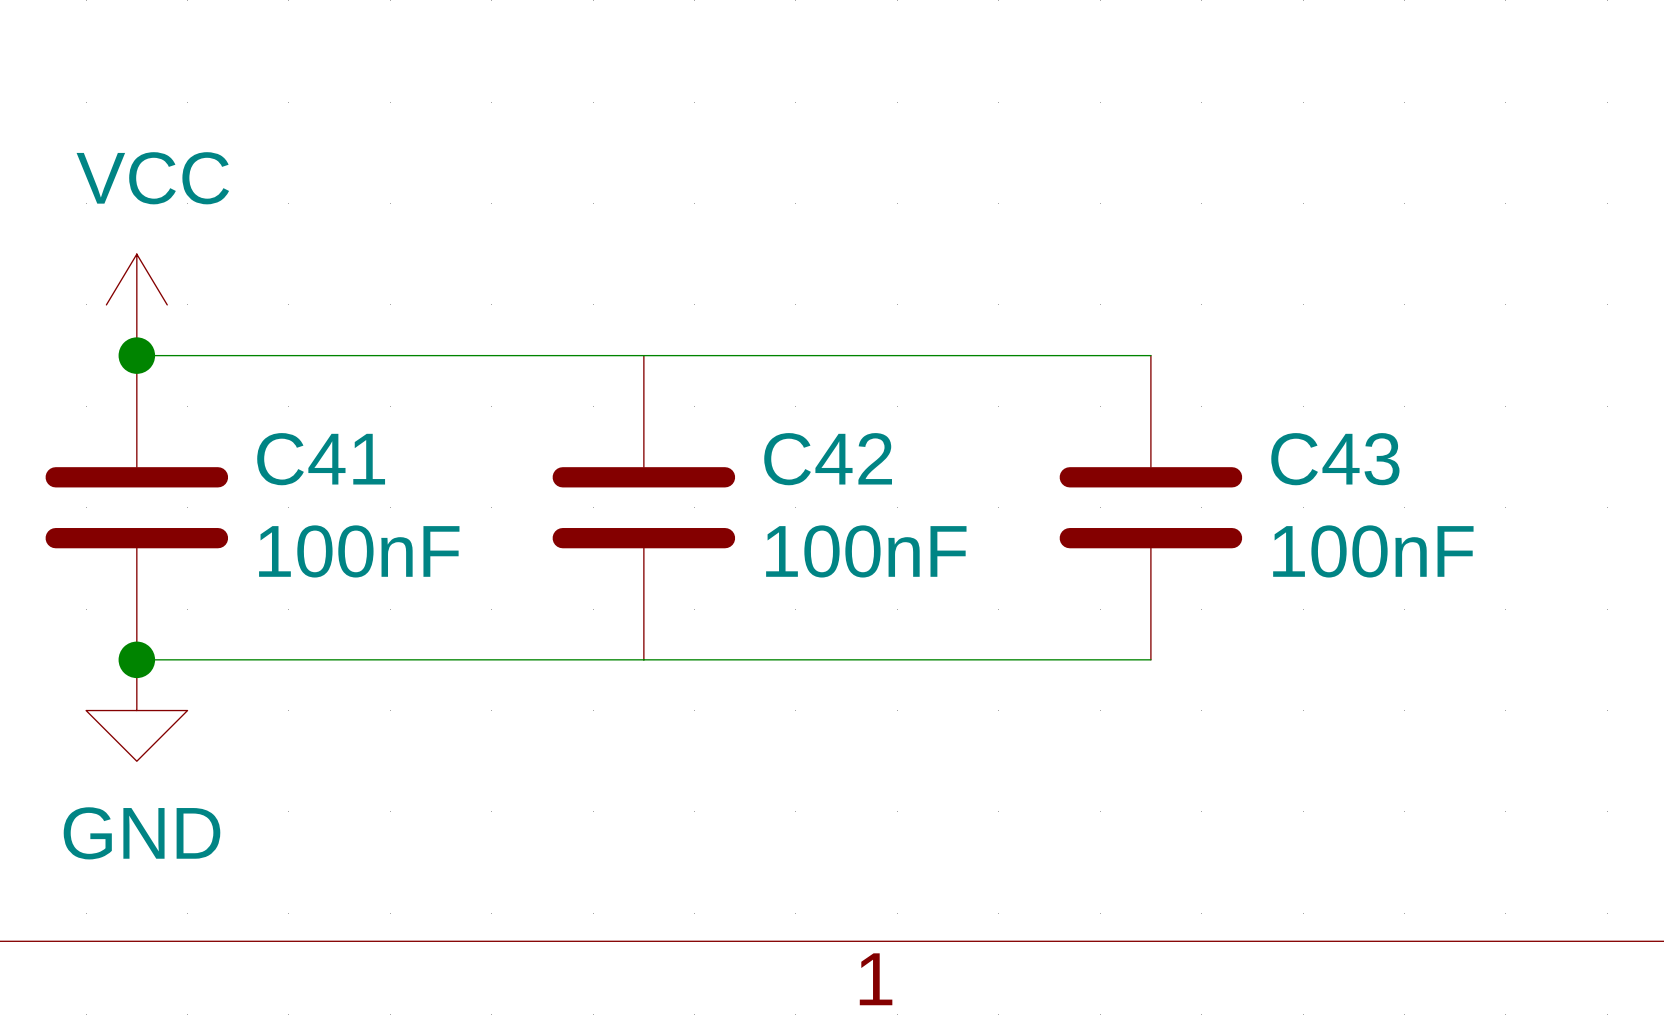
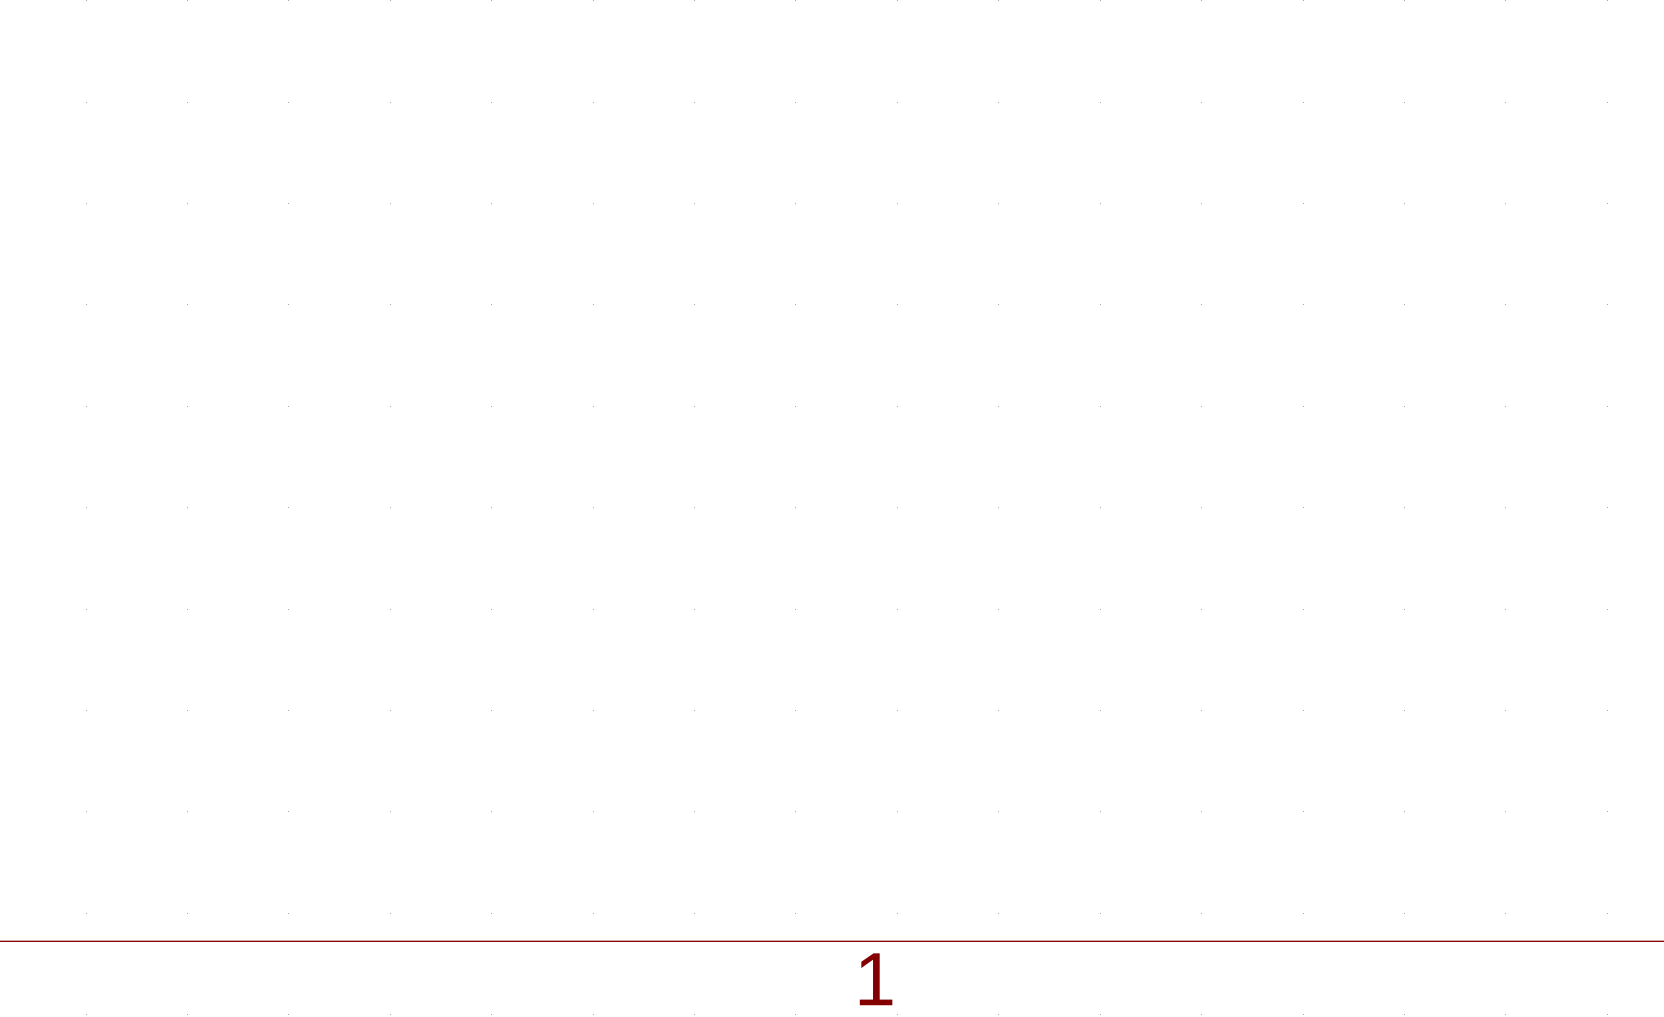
power symbol: VCC (136, 304) -> none
wire: (136, 355) (1150, 355) -> none
junction: (136, 355) -> none
C41: 100nF (136, 507) -> none
C42: 100nF (643, 507) -> none
C43: 100nF (1150, 507) -> none
wire: (136, 659) (1150, 659) -> none
junction: (136, 659) -> none
power symbol: GND (136, 710) -> none

